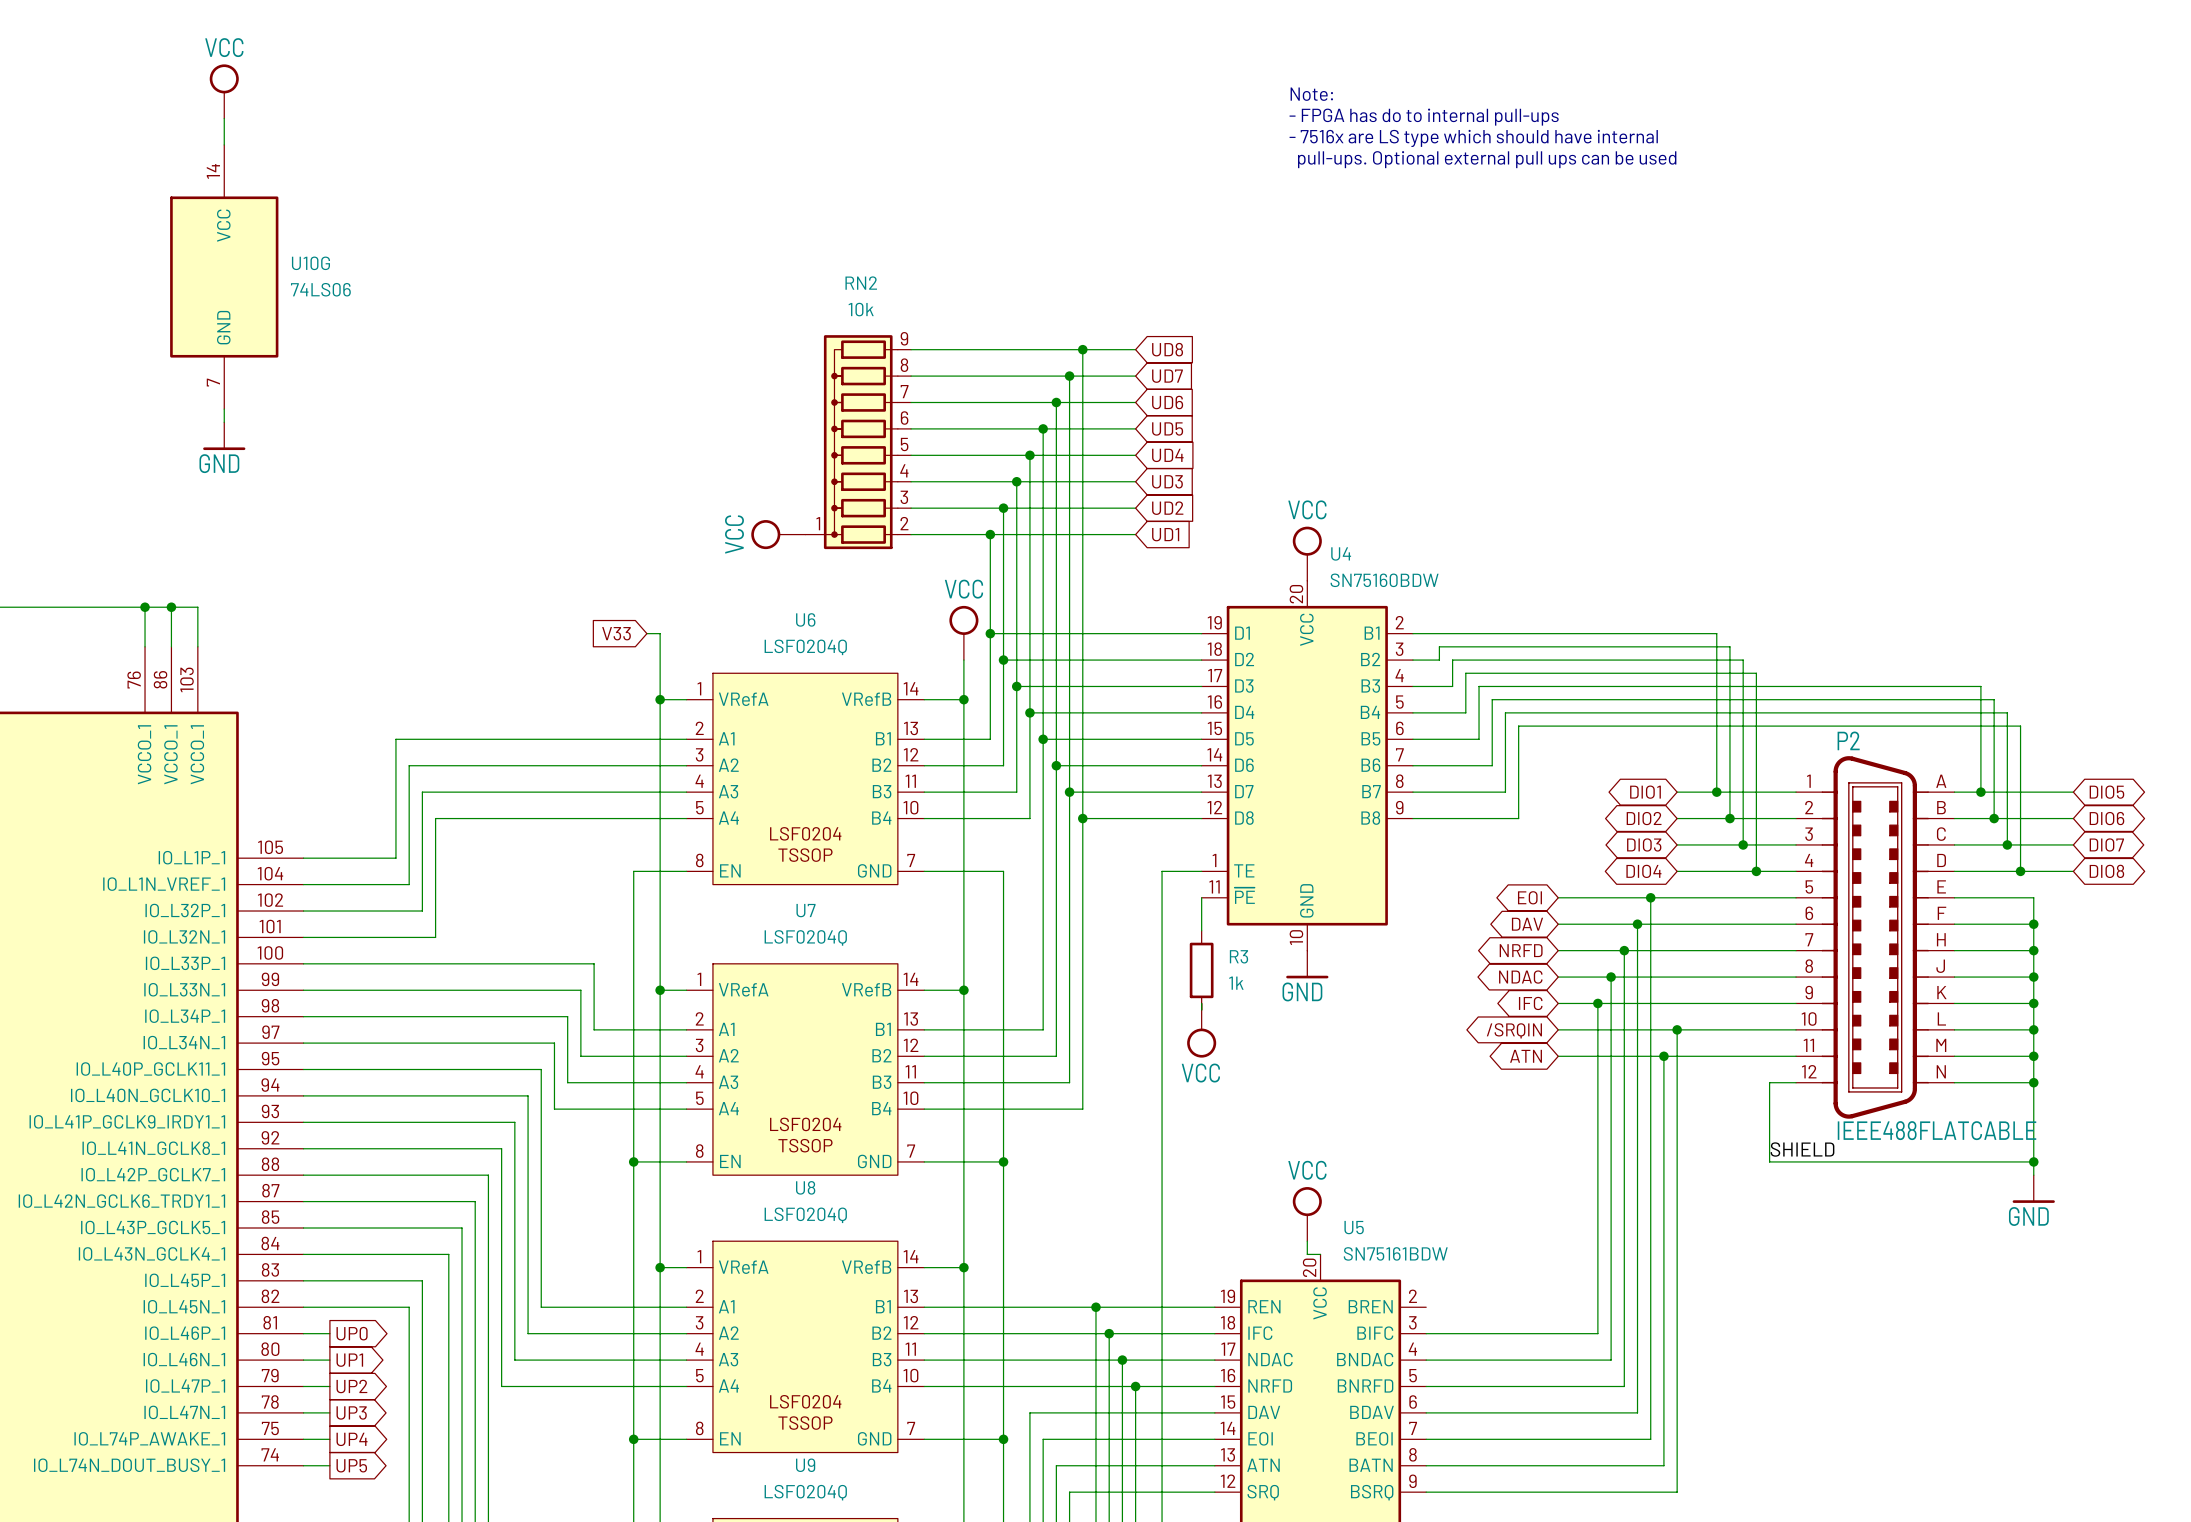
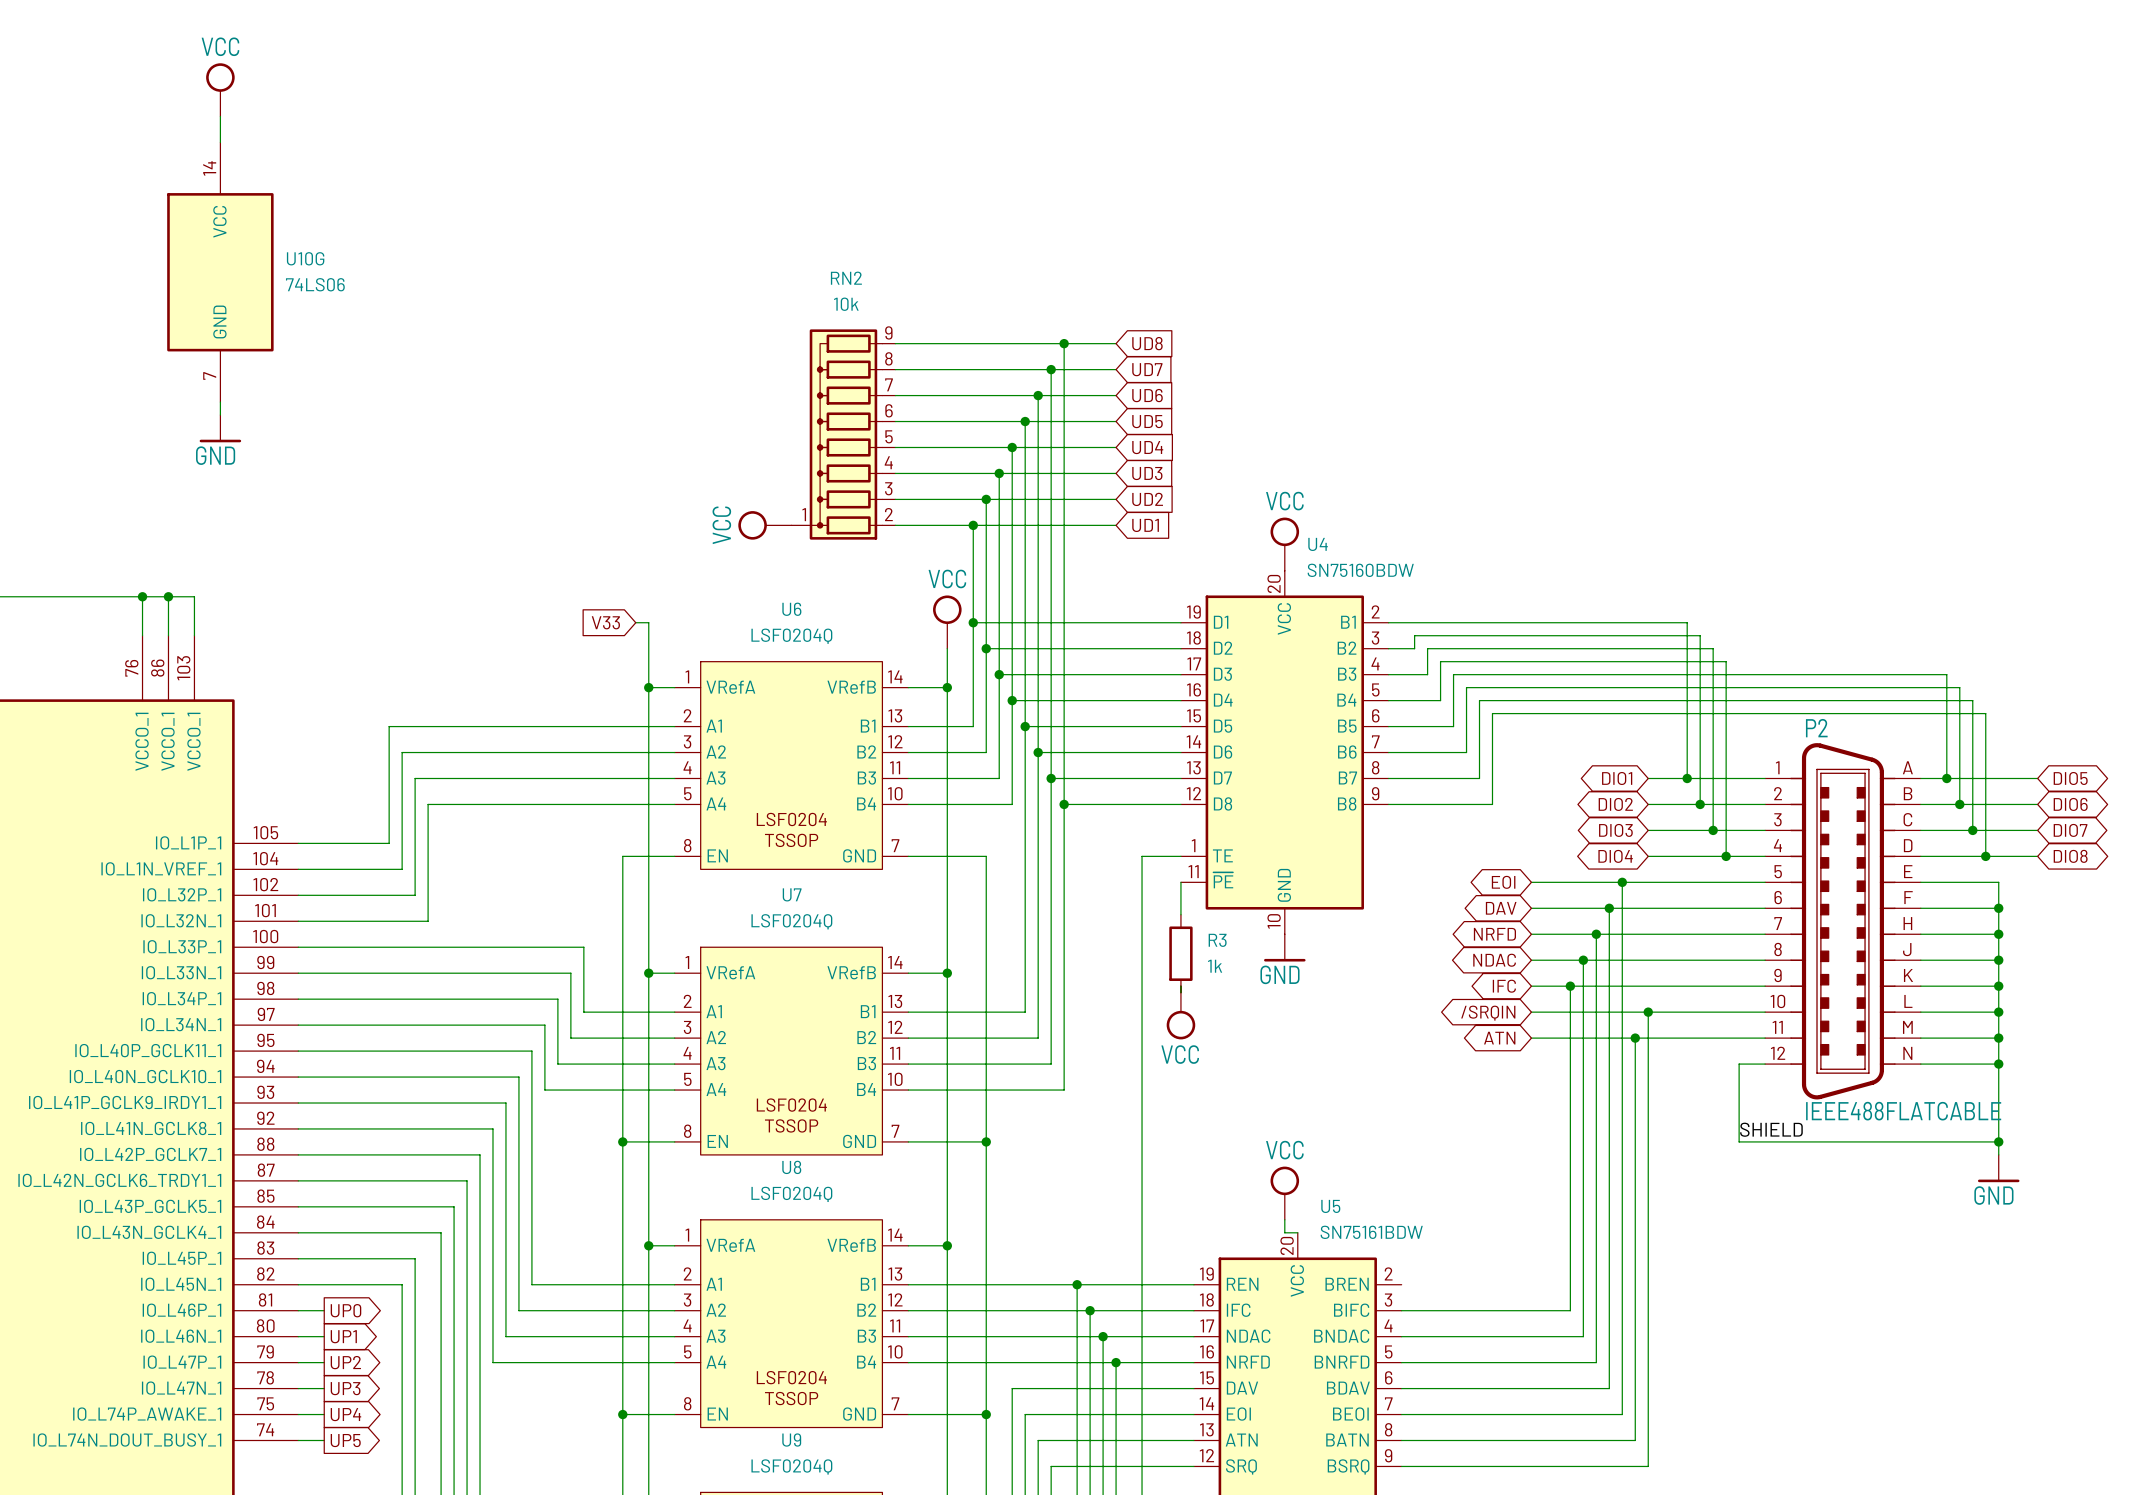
text: Note: (1311, 94) -> none
text: - FPGA has do to internal pull-ups (1424, 117) -> none
text: - 7516x are LS type which should have internal (1473, 138) -> none
text: pull-ups. Optional external pull ups can be used (1487, 159) -> none

